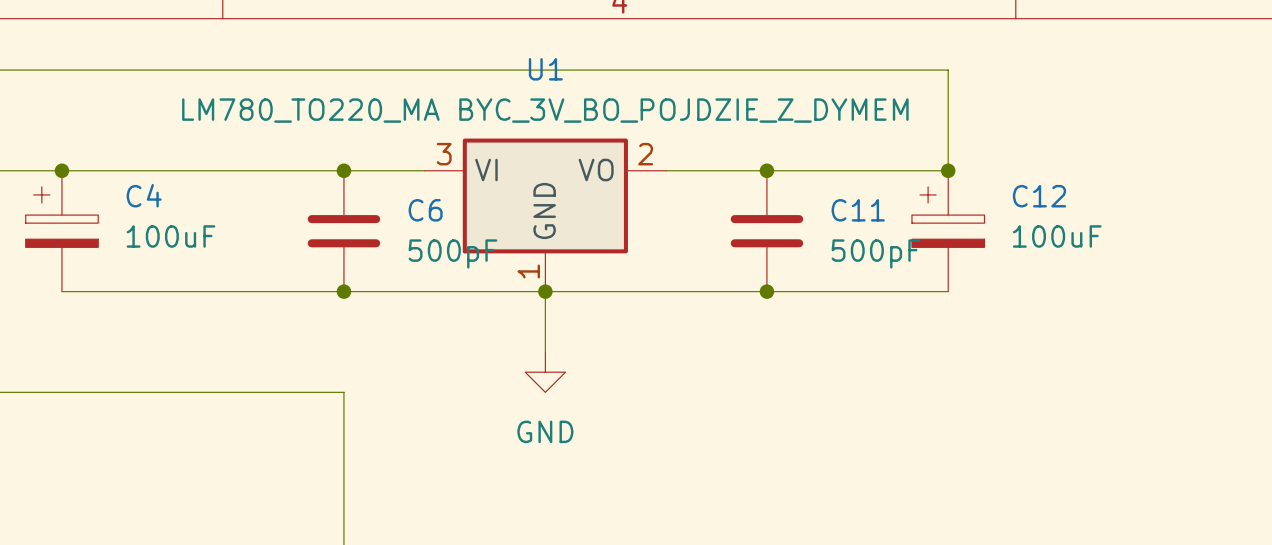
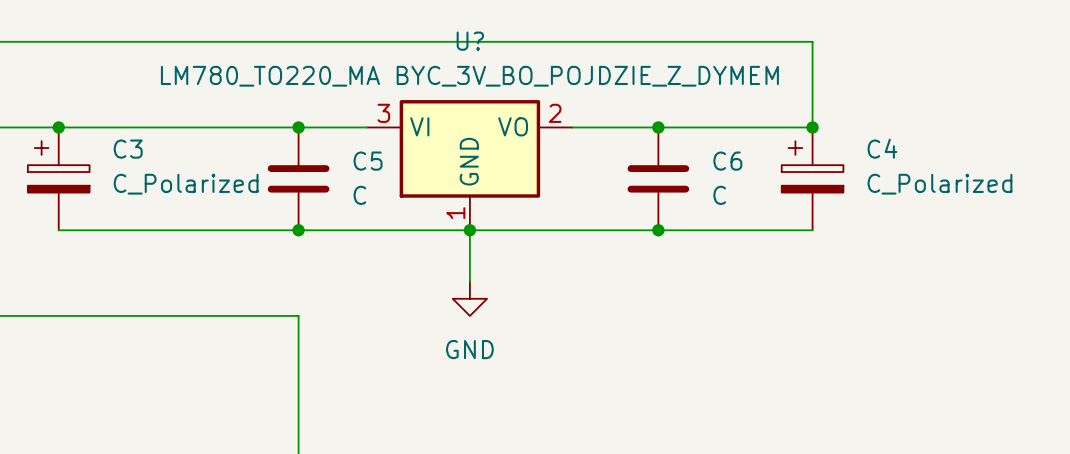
U1 name: U1 (545, 69) -> U? (470, 41)
C4 name: C4 (144, 195) -> C3 (128, 149)
C12 name: C12 (1039, 196) -> C4 (882, 148)
C6 name: C6 (425, 210) -> C5 (368, 161)
C11 name: C11 (858, 210) -> C6 (727, 161)
C4 value: 100uF (170, 236) -> C_Polarized (186, 184)
C12 value: 100uF (1057, 236) -> C_Polarized (939, 184)
C6 value: 500pF (452, 253) -> C (359, 195)
C11 value: 500pF (875, 253) -> C (719, 195)

